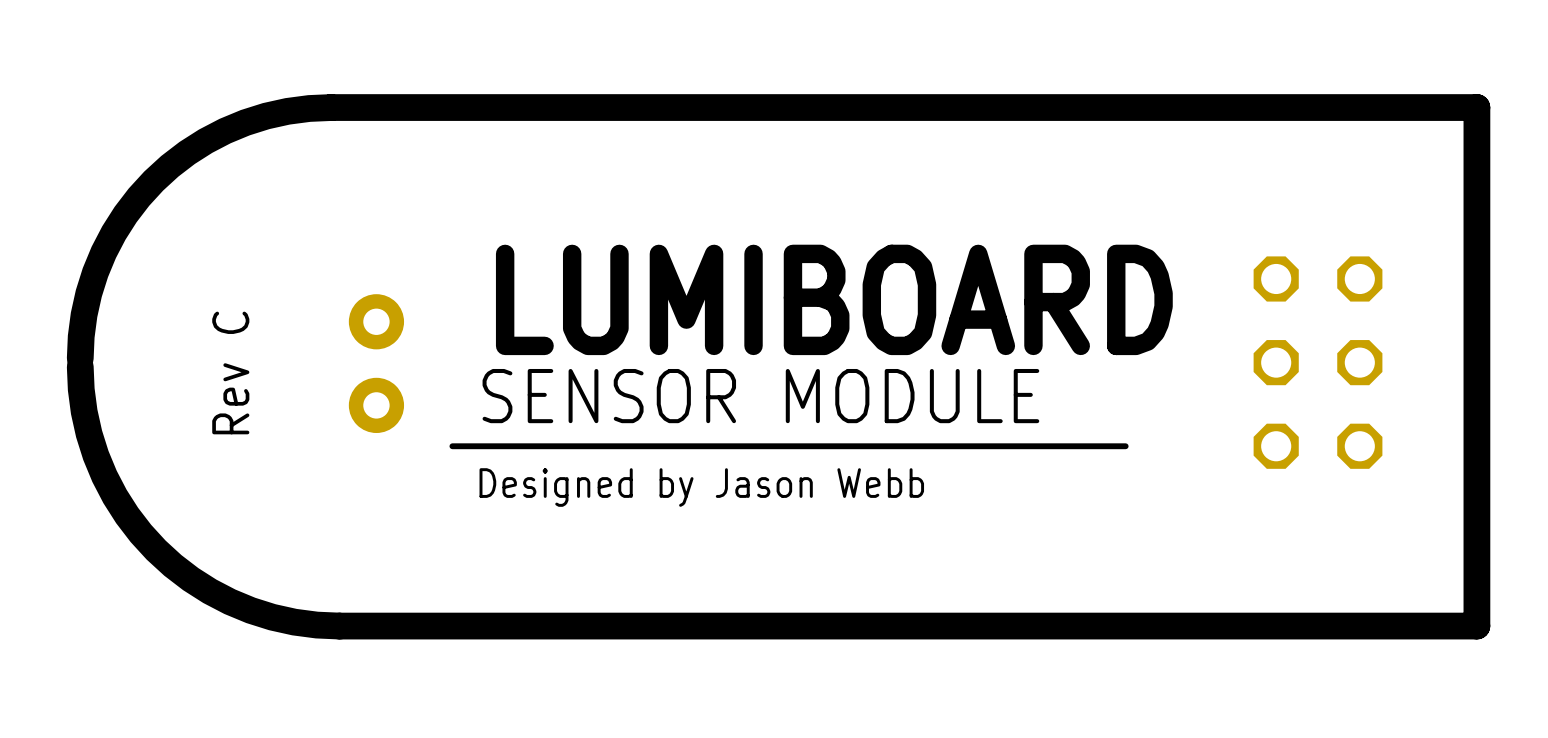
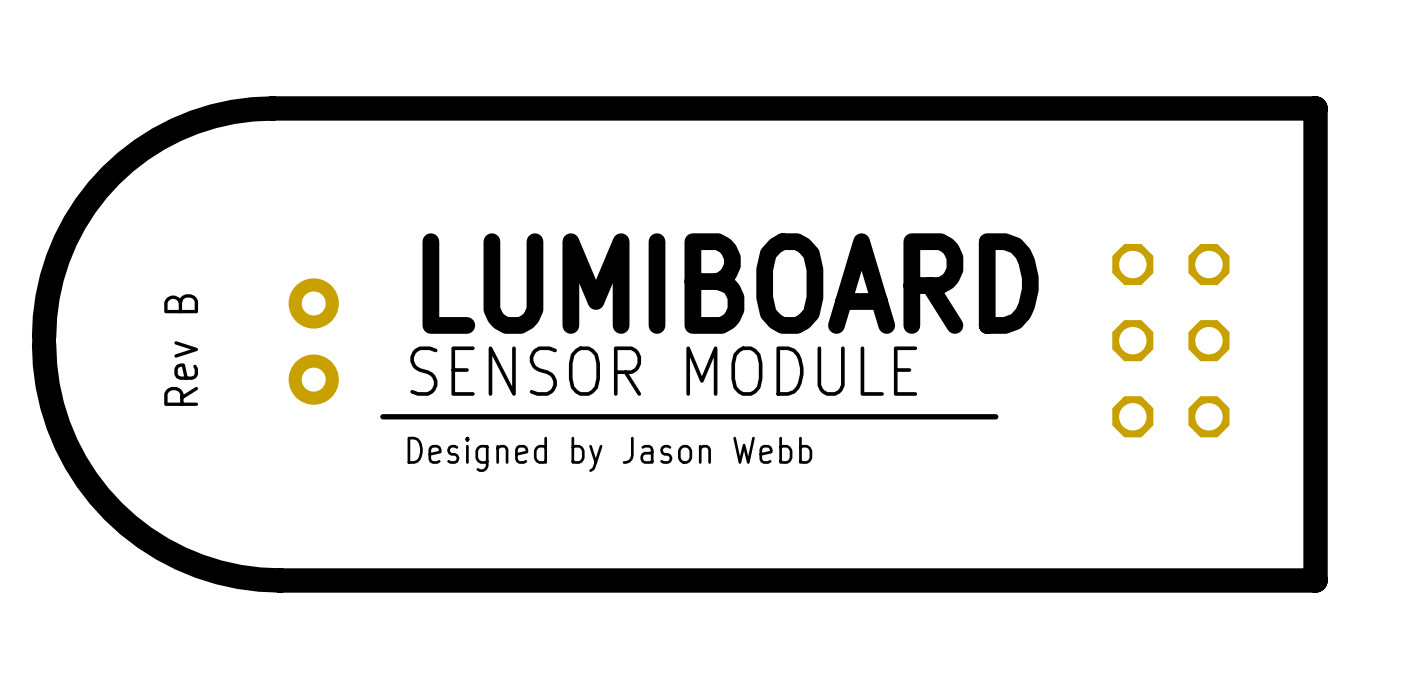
text: Rev C (230, 372) -> Rev B (181, 350)

